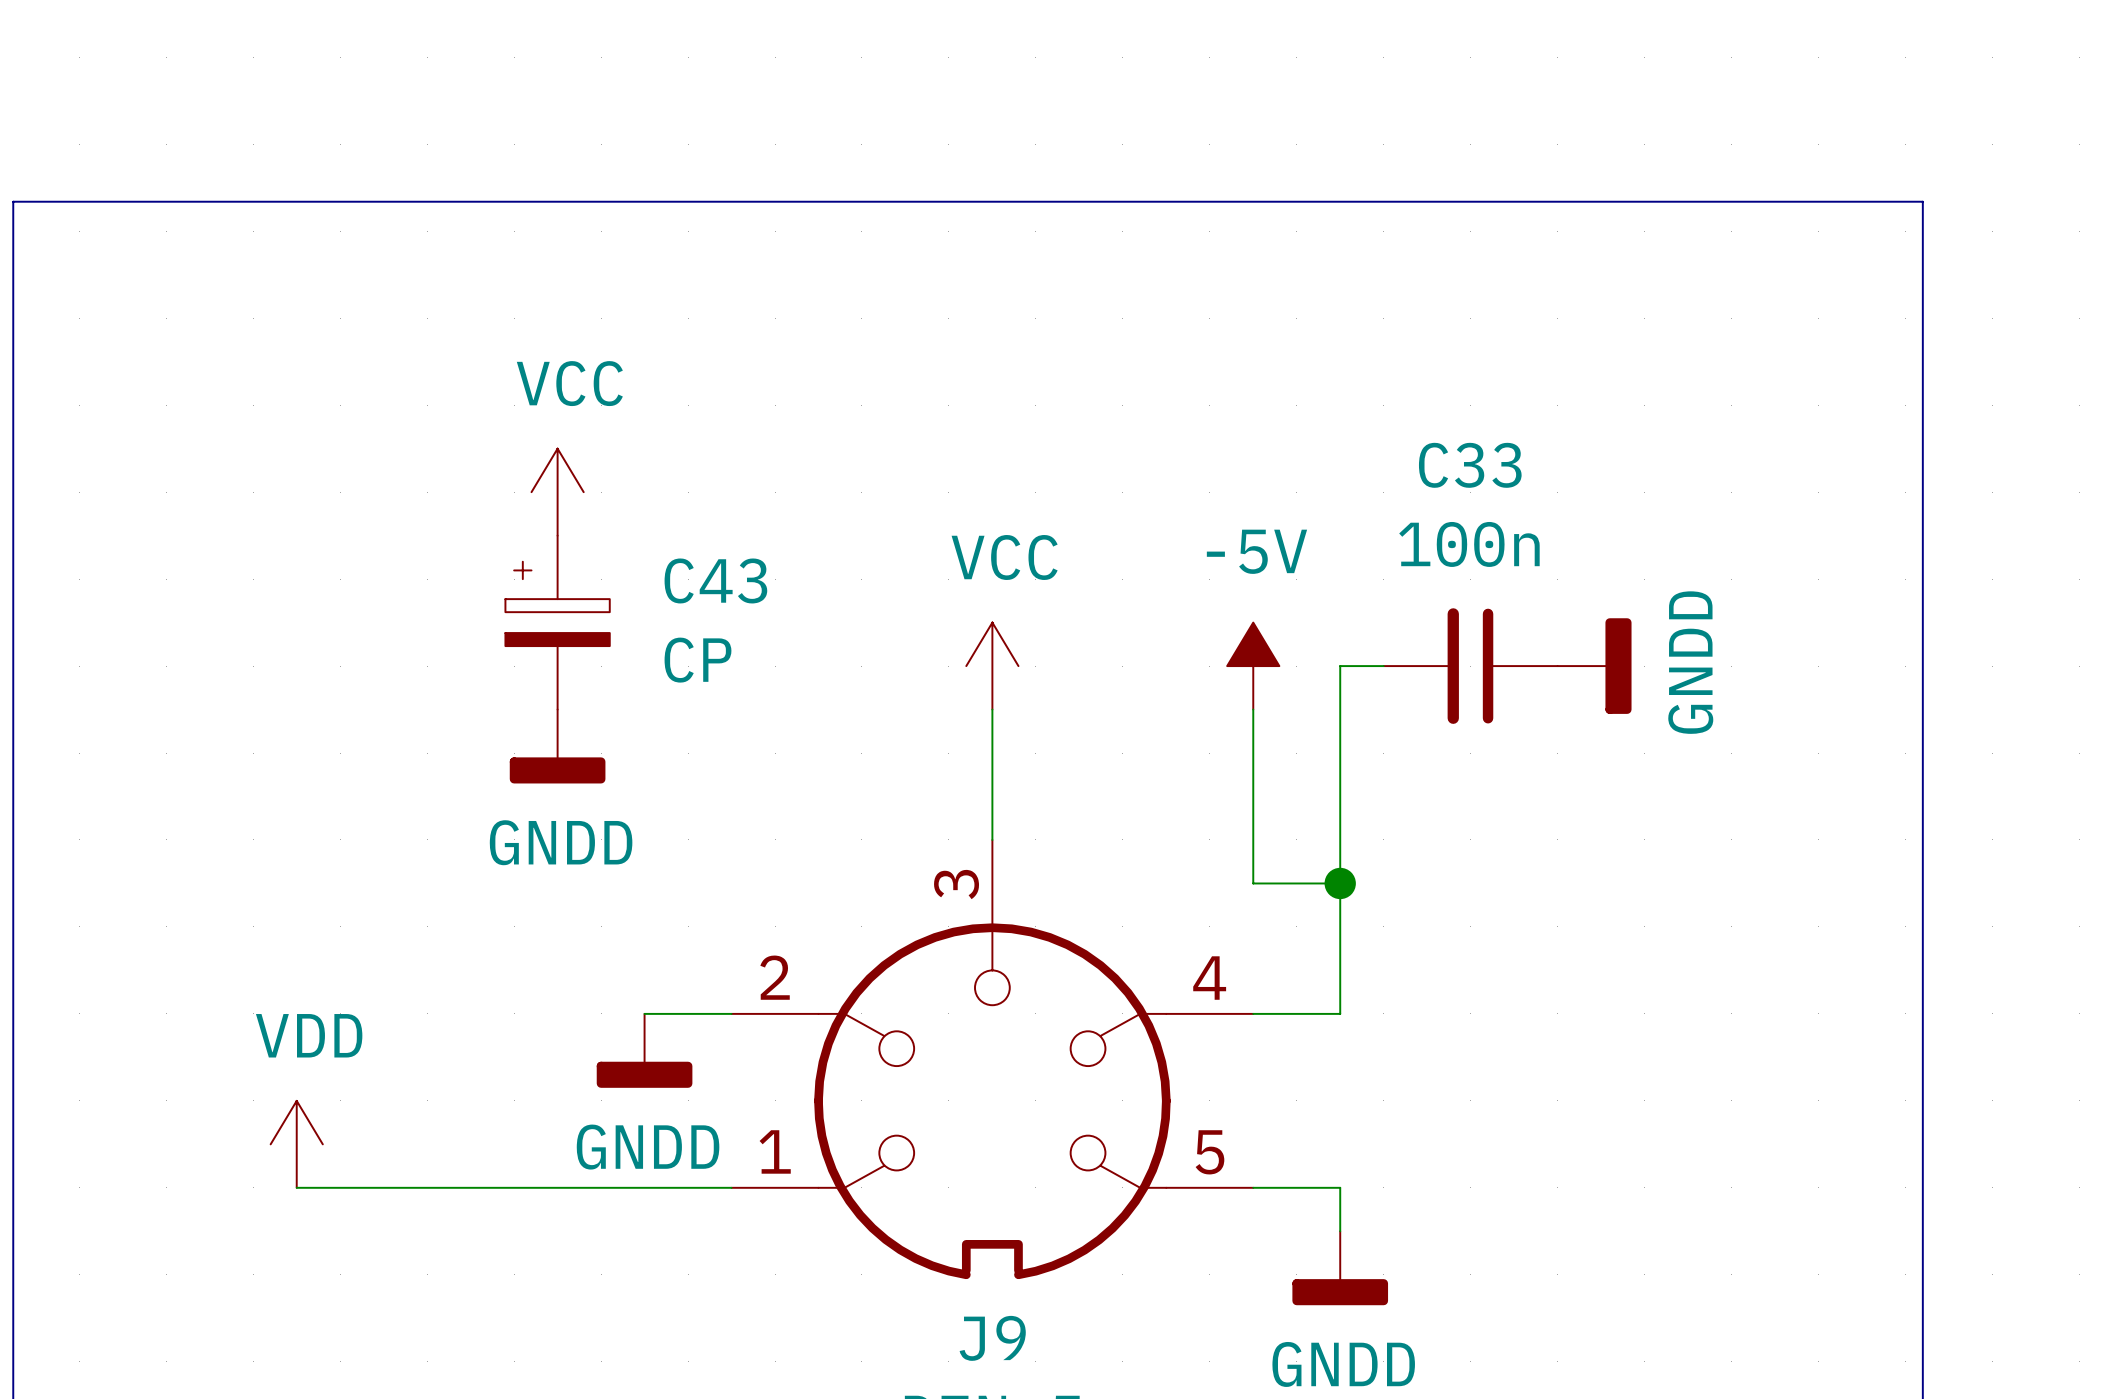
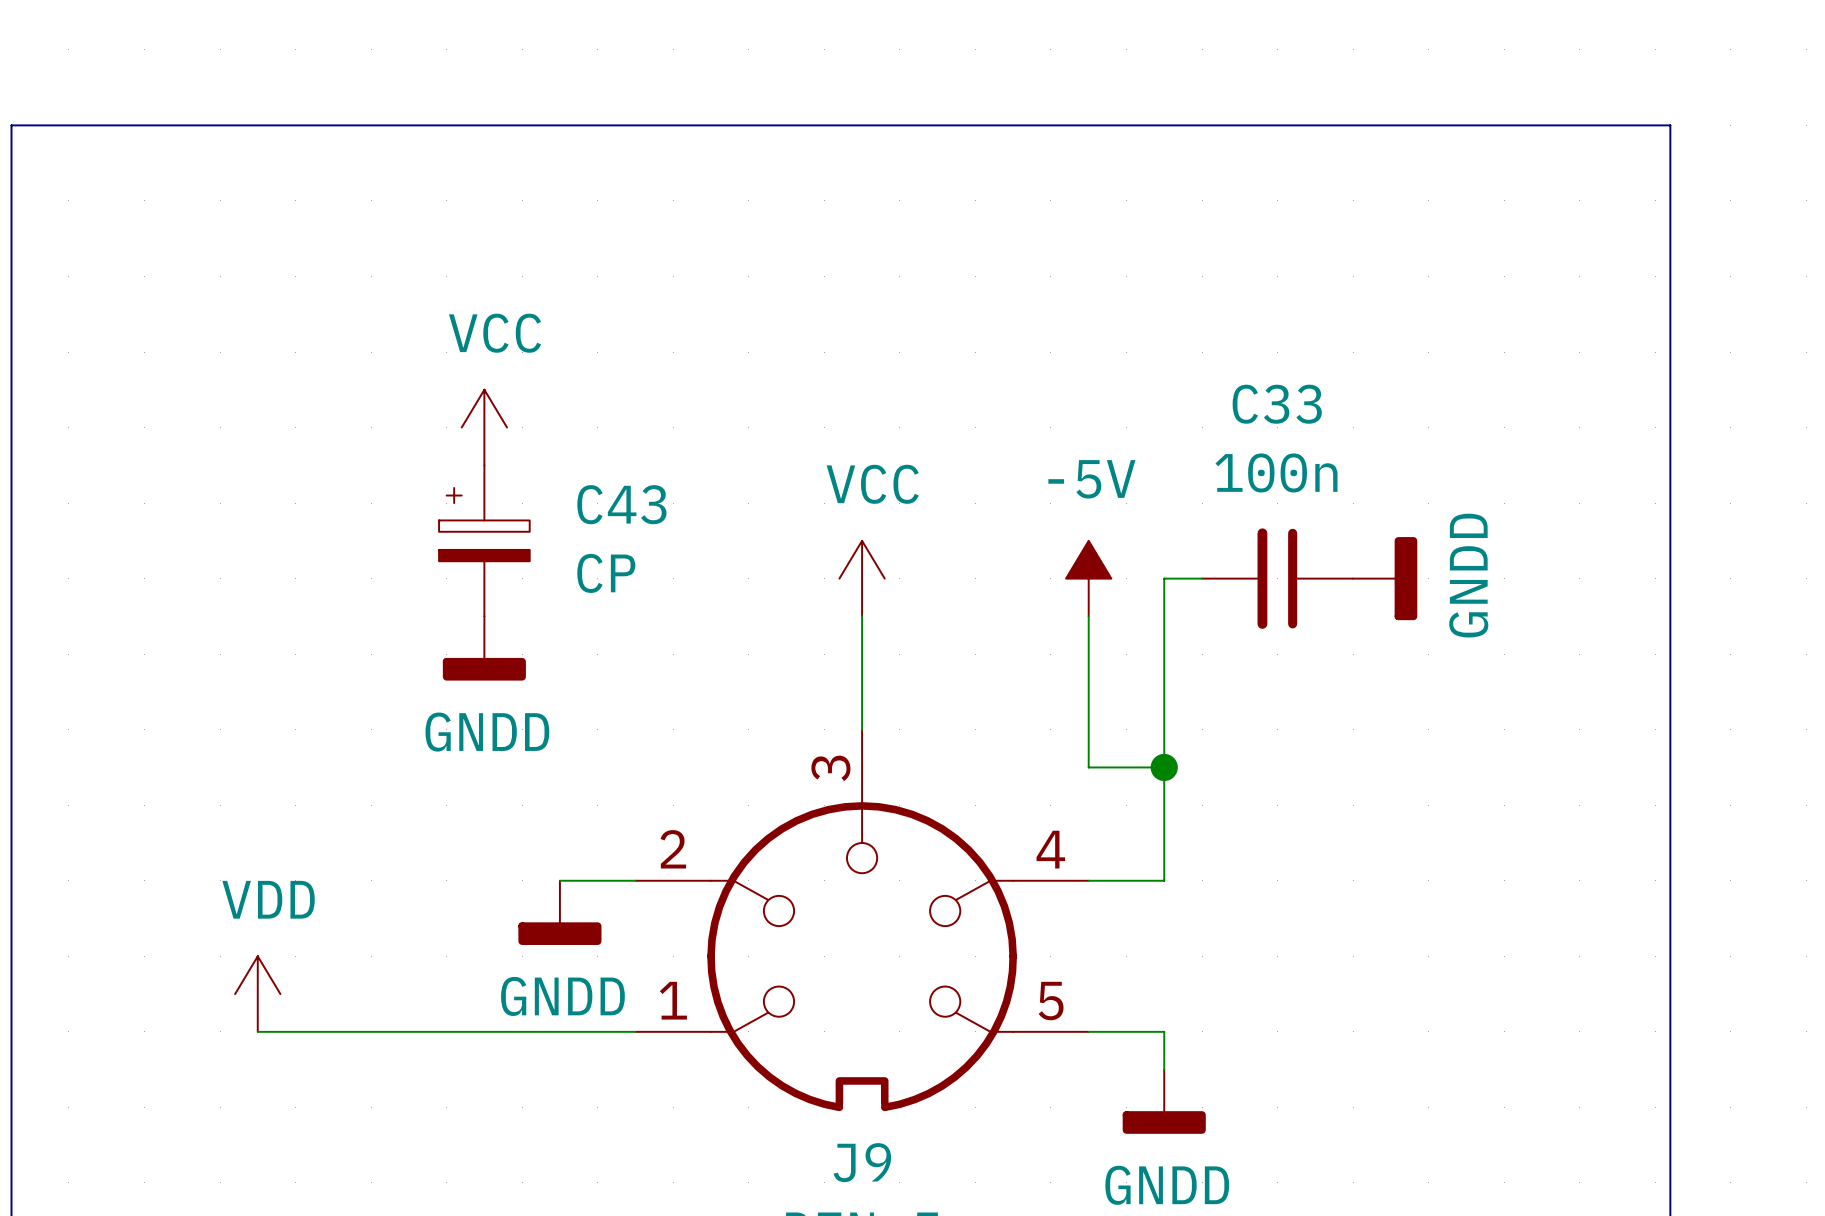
line: (13, 201) (1922, 201) -> (11, 175) (11, 125) (1670, 125) (1670, 175)

